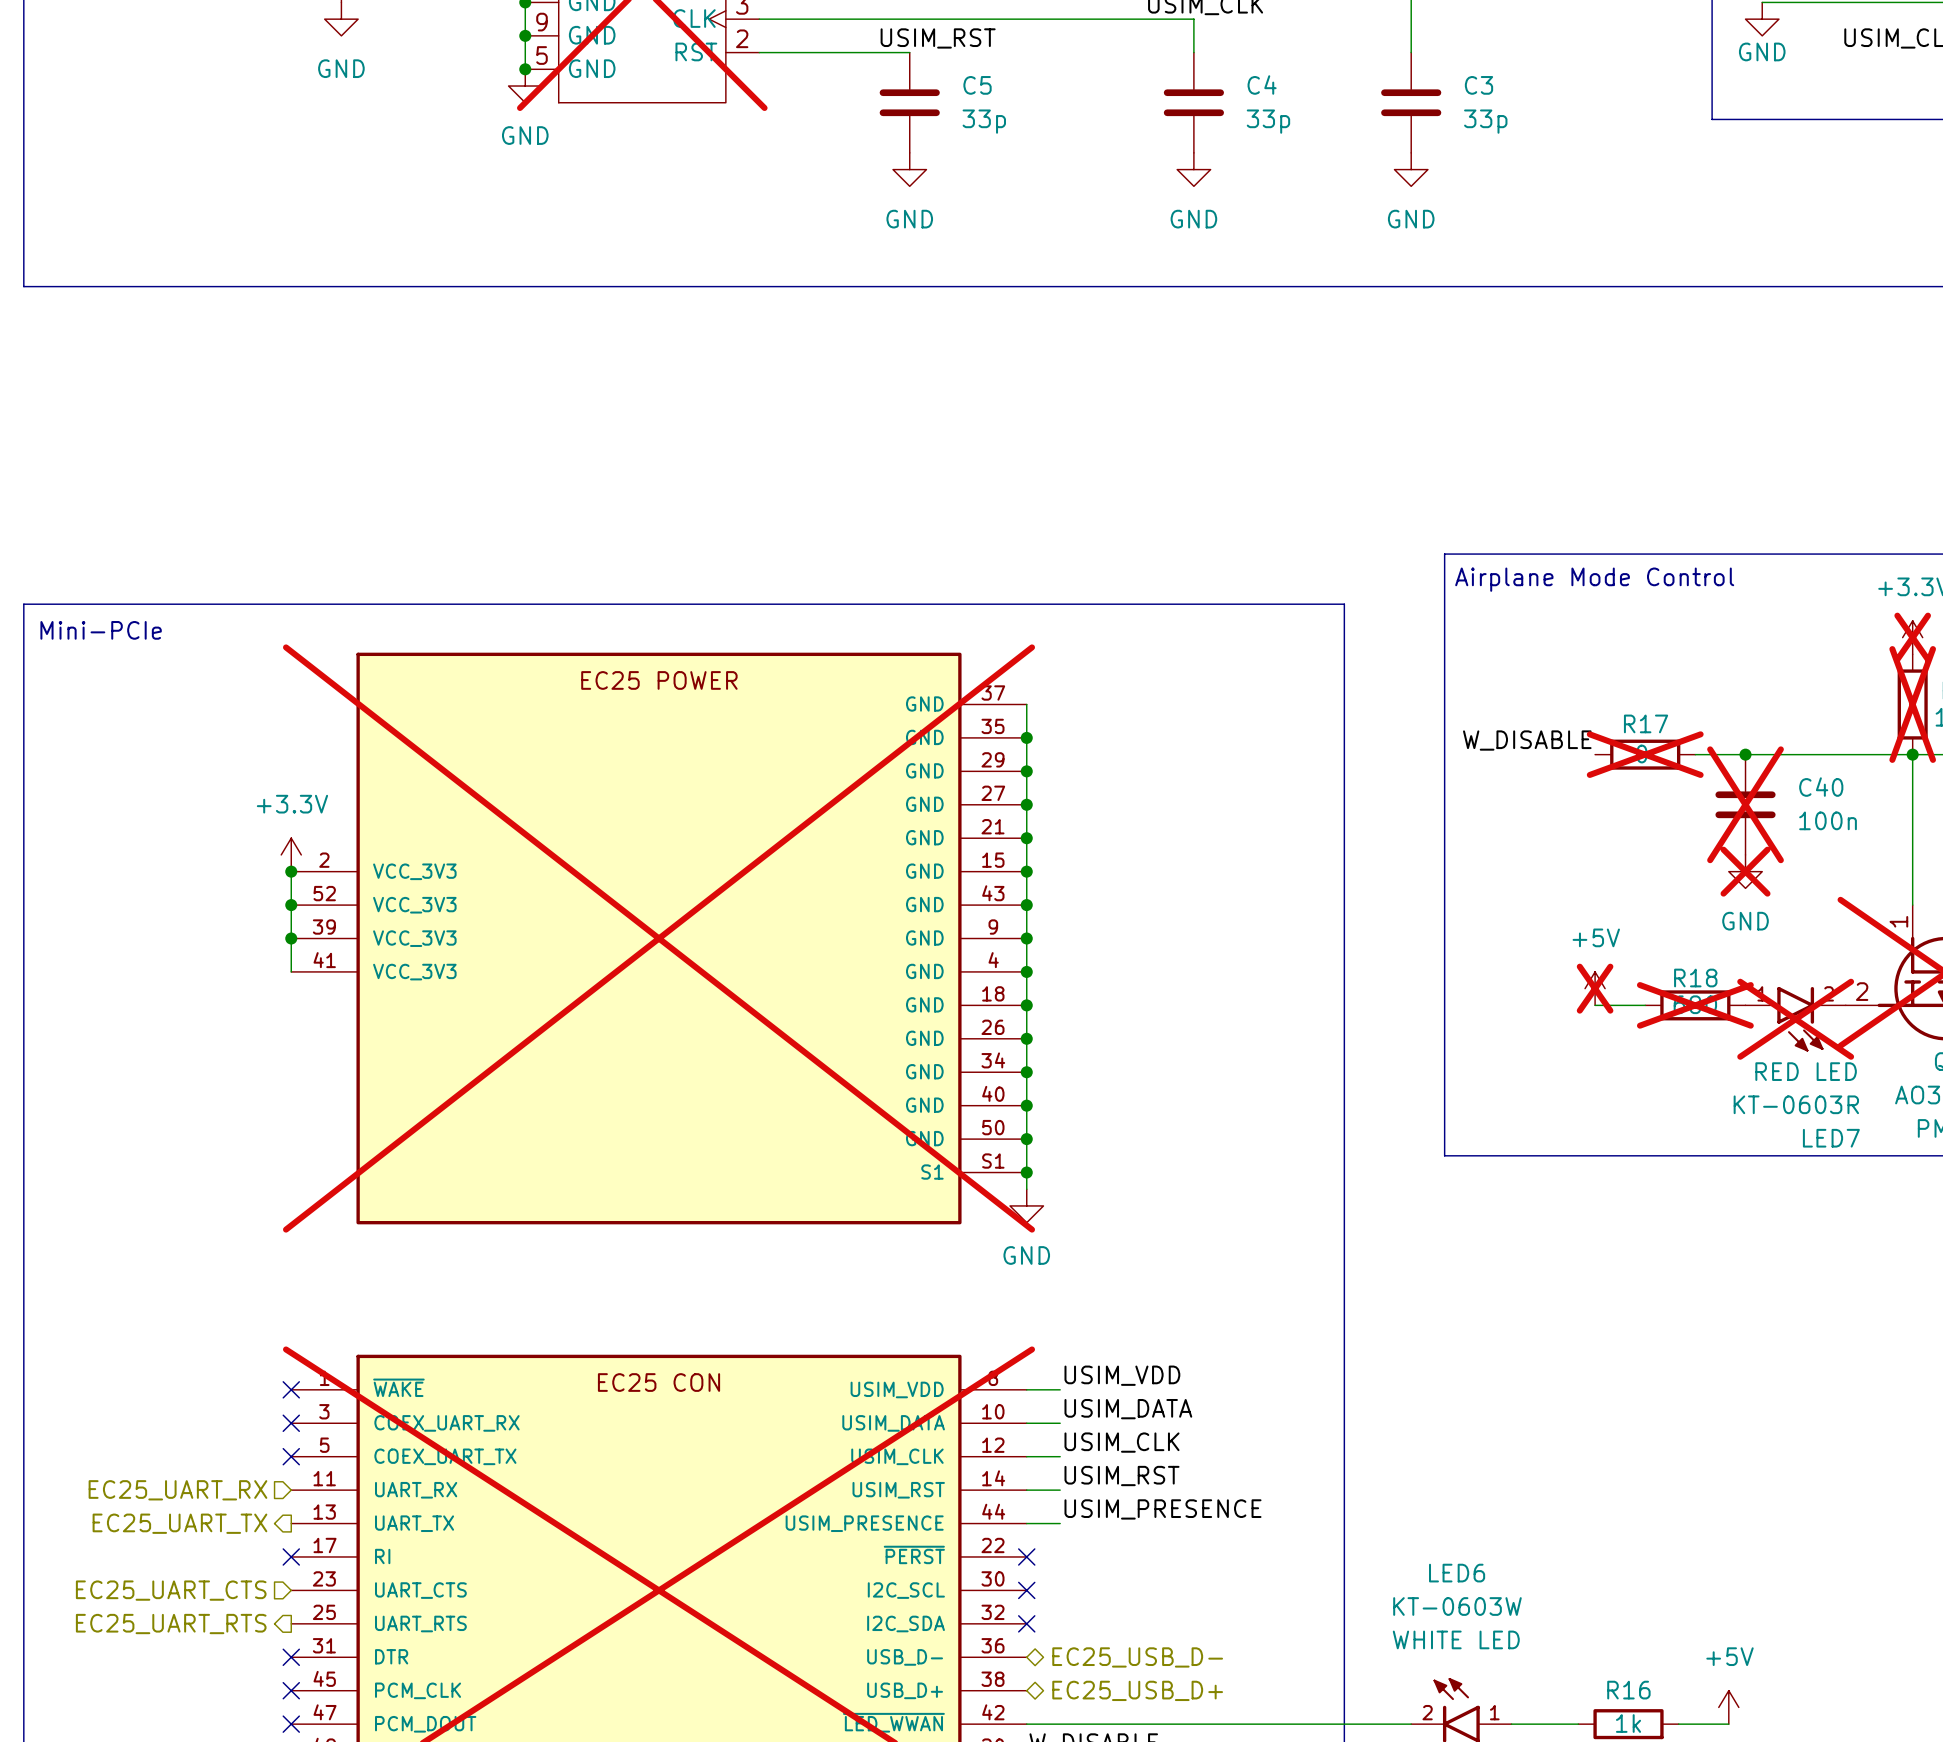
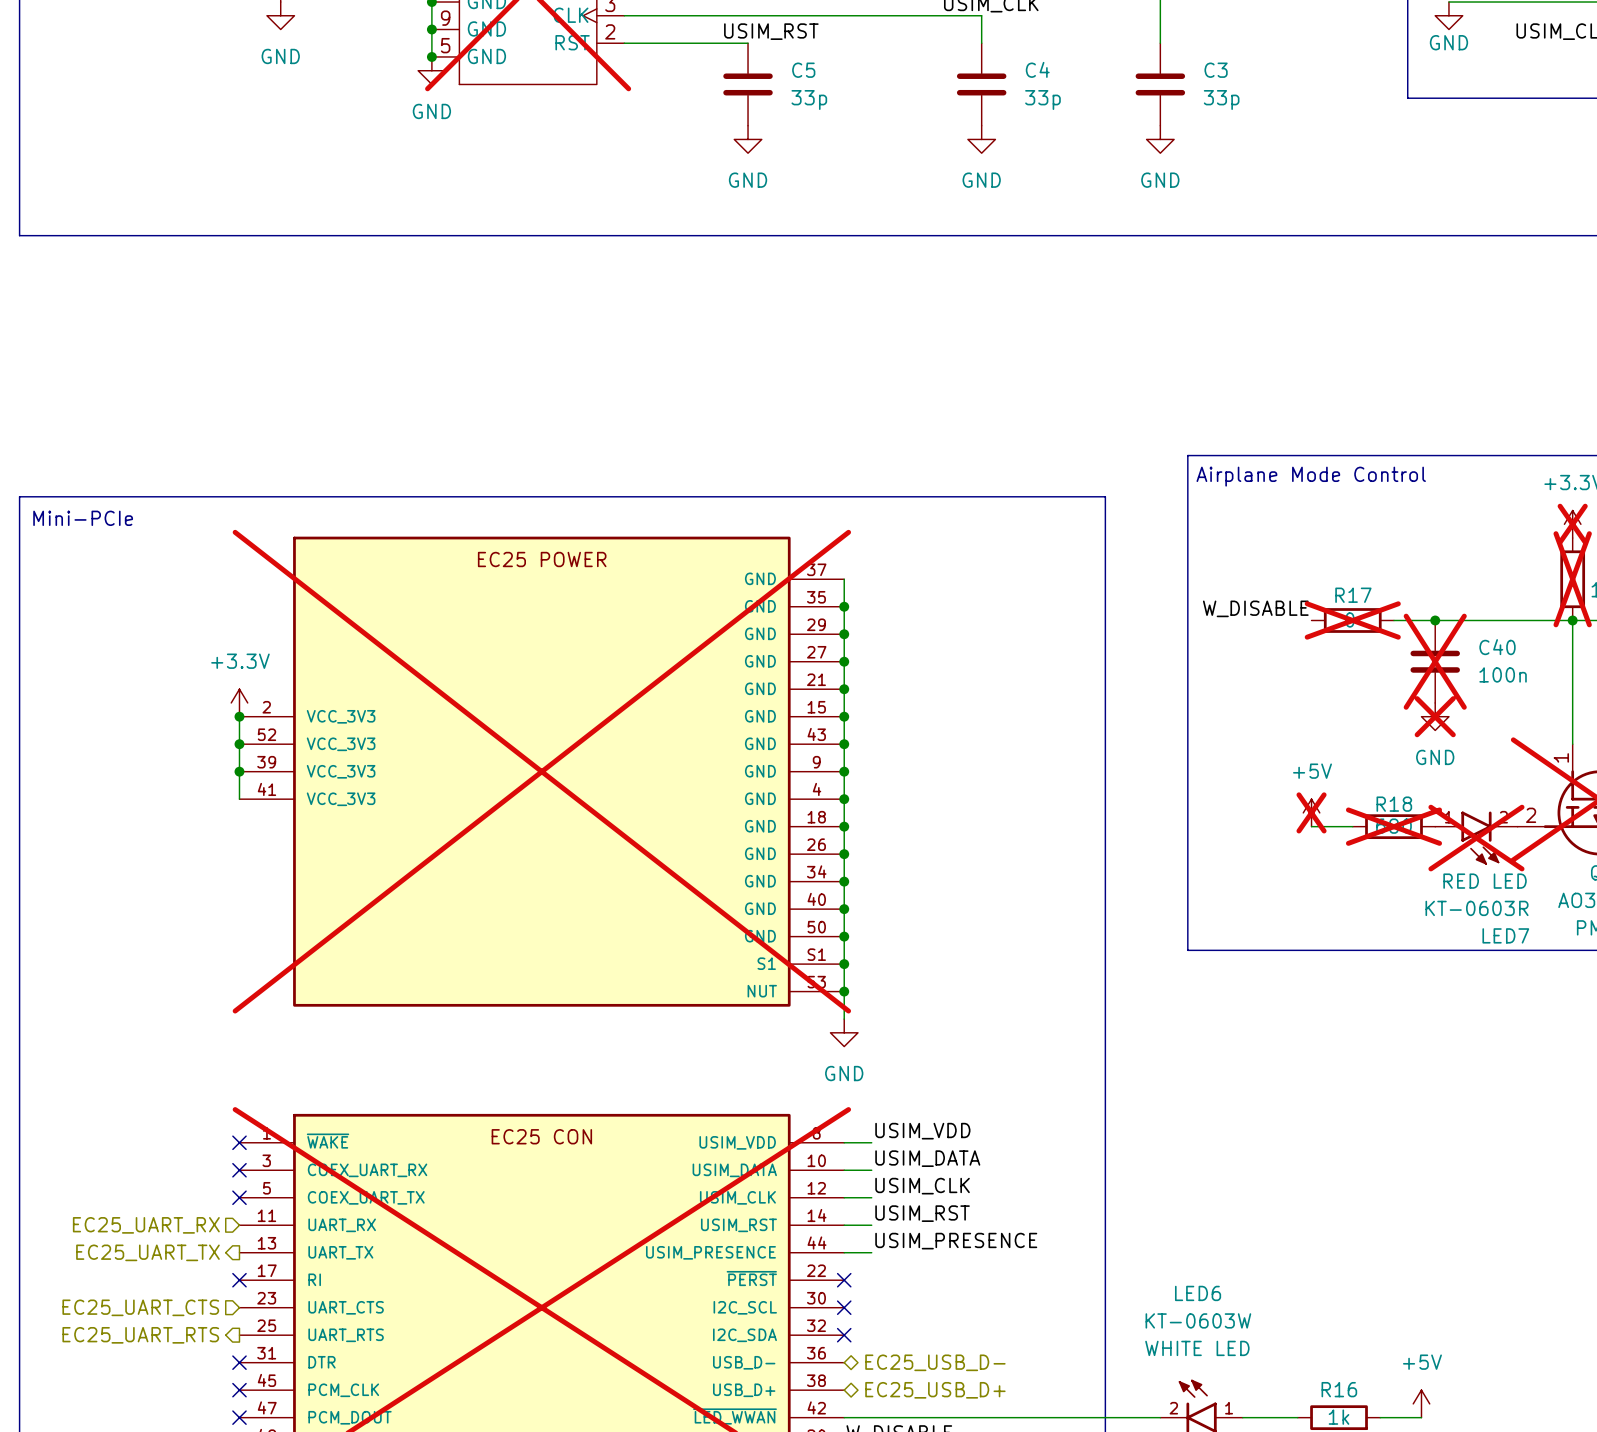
part symbol: [291, 652, 1027, 1225] -> [239, 536, 845, 1007]
power symbol position: GND (1026, 1205) -> GND (844, 1032)
junction: none -> (844, 991)

